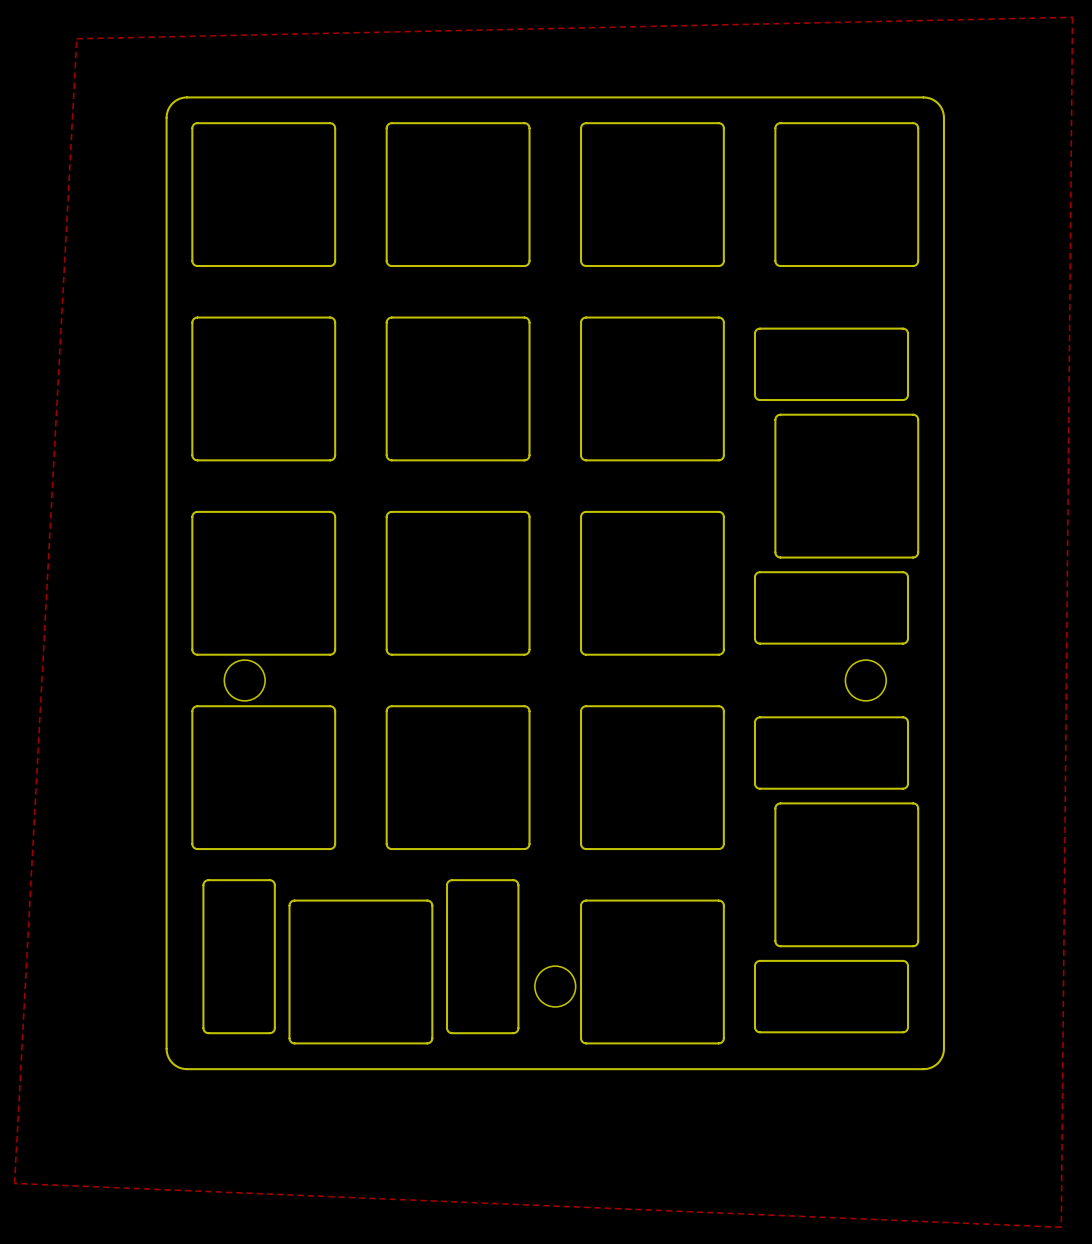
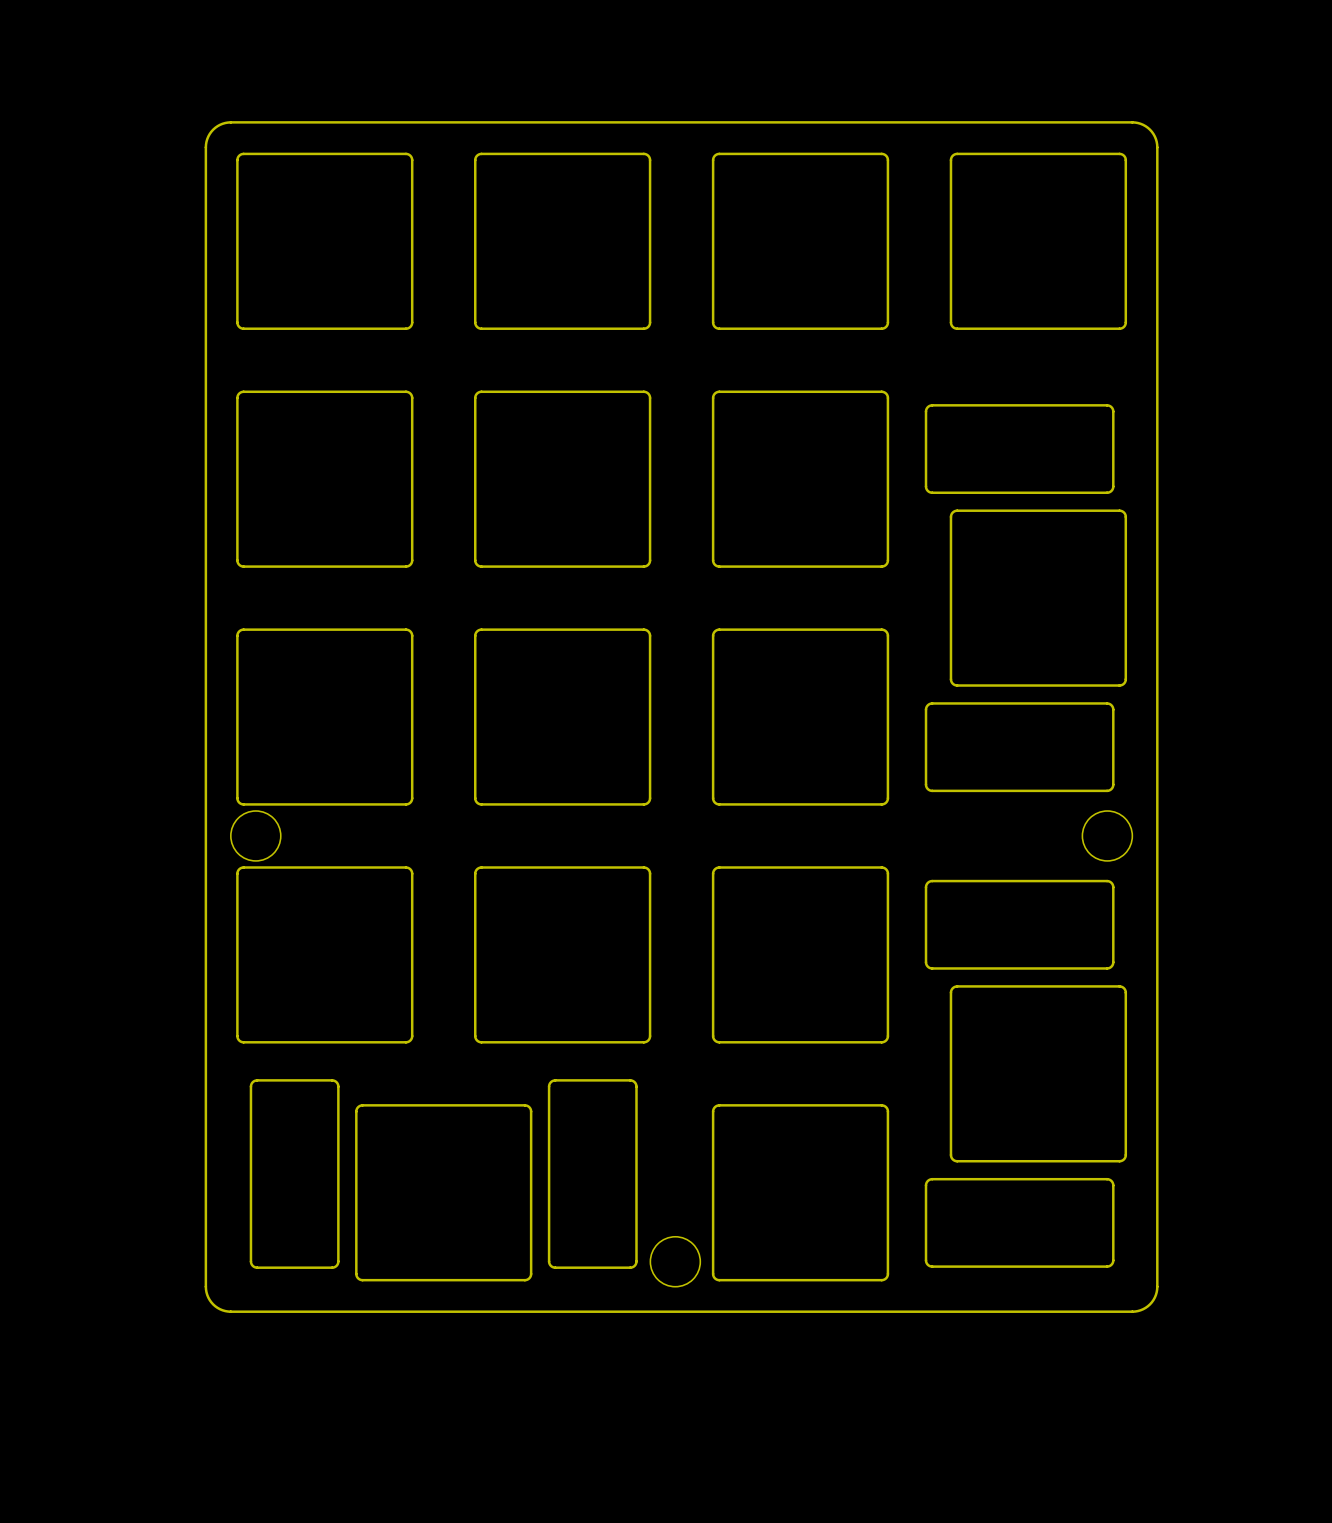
zone outline: (1072, 17) (76, 38) (14, 1183) (1061, 1227) (1072, 17) -> none
round board edge position: (244, 680) -> (255, 835)
round board edge position: (865, 680) -> (1107, 835)
round board edge position: (555, 986) -> (675, 1261)

